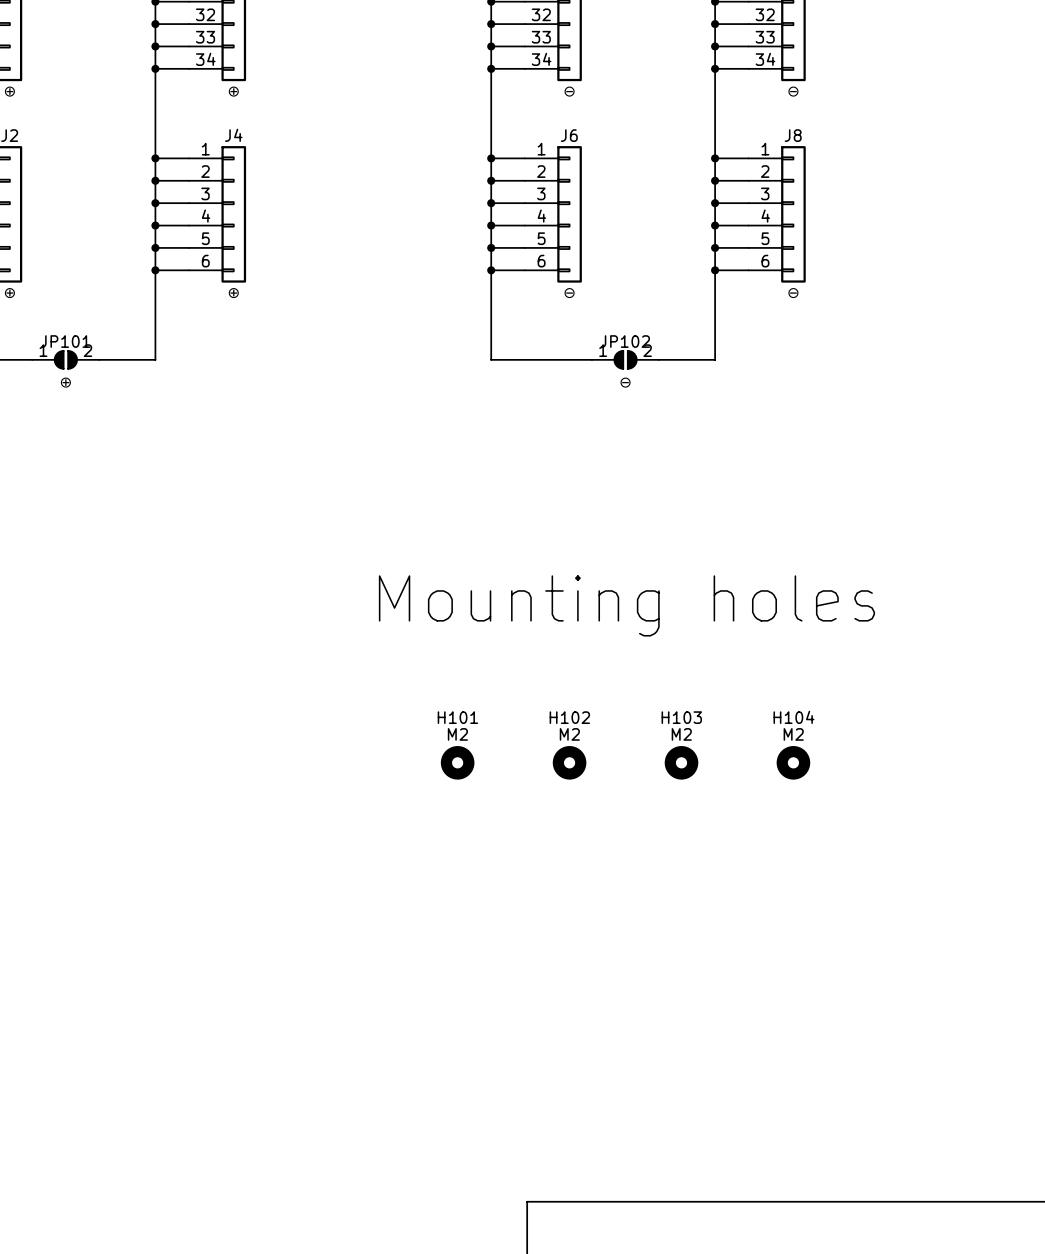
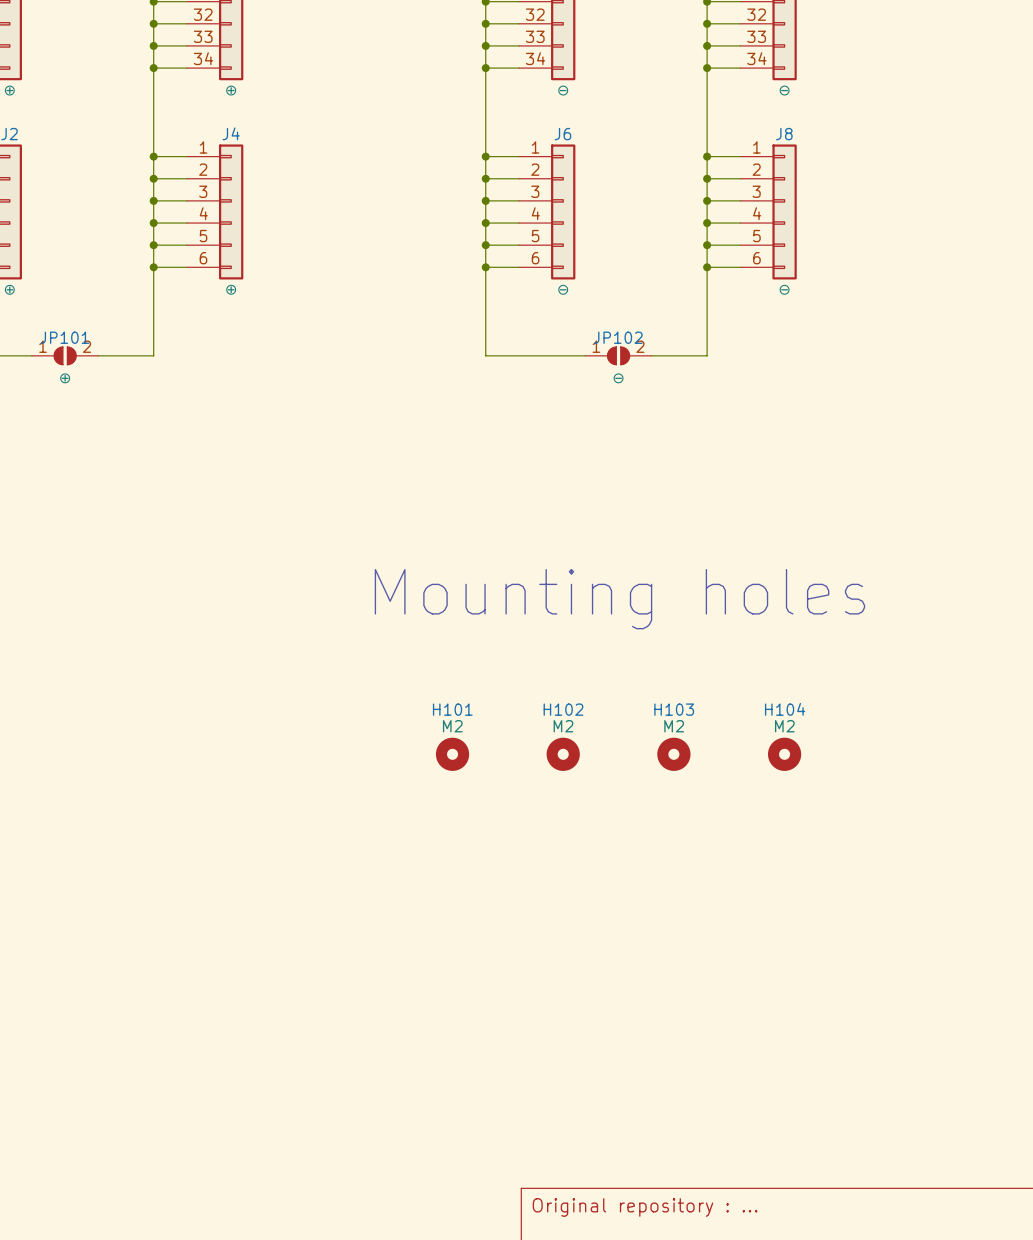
title block: none -> Original repository : ... (645, 1207)

